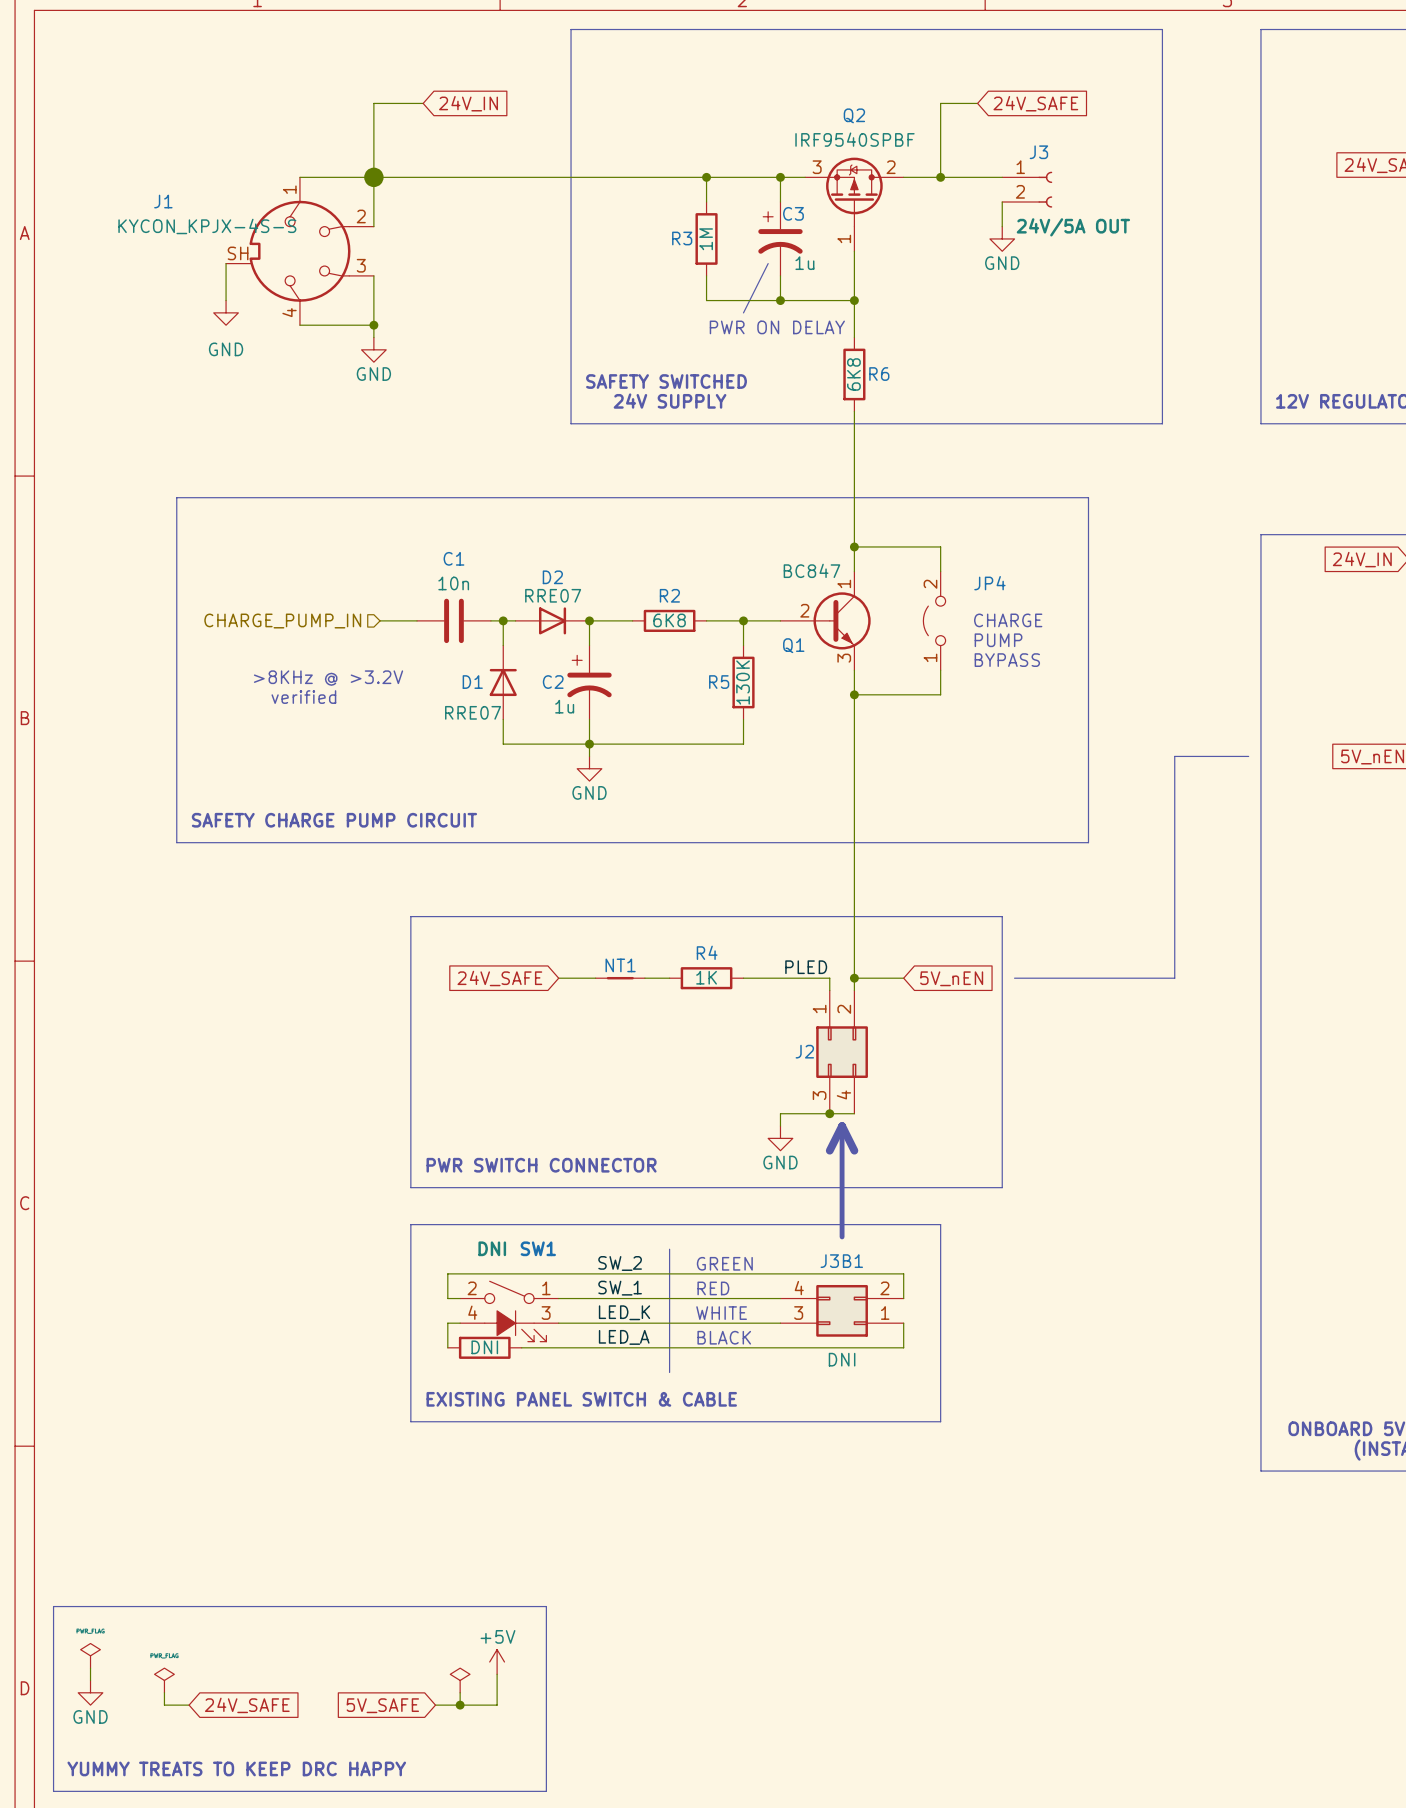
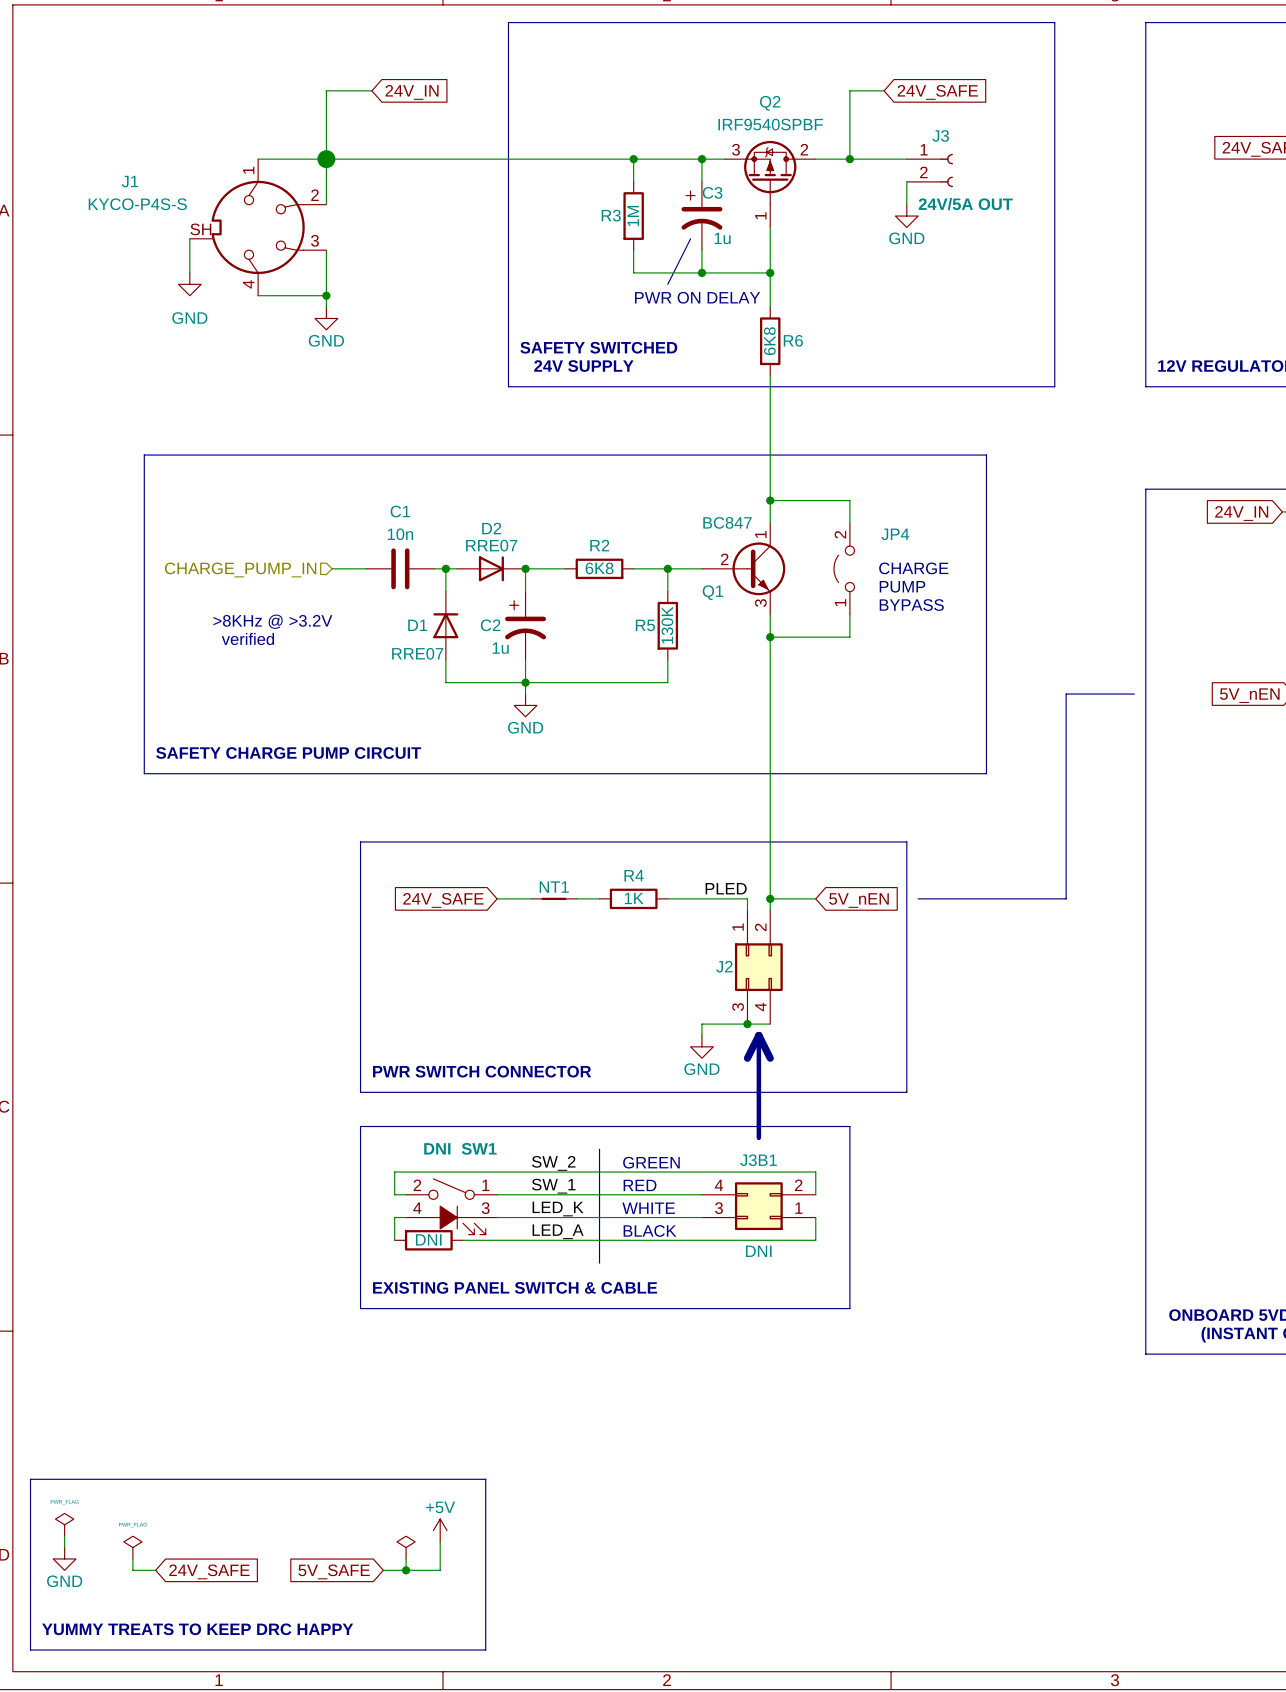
J1 value: KYCON_KPJX-4S-S (207, 226) -> KYCO-P4S-S (137, 204)

